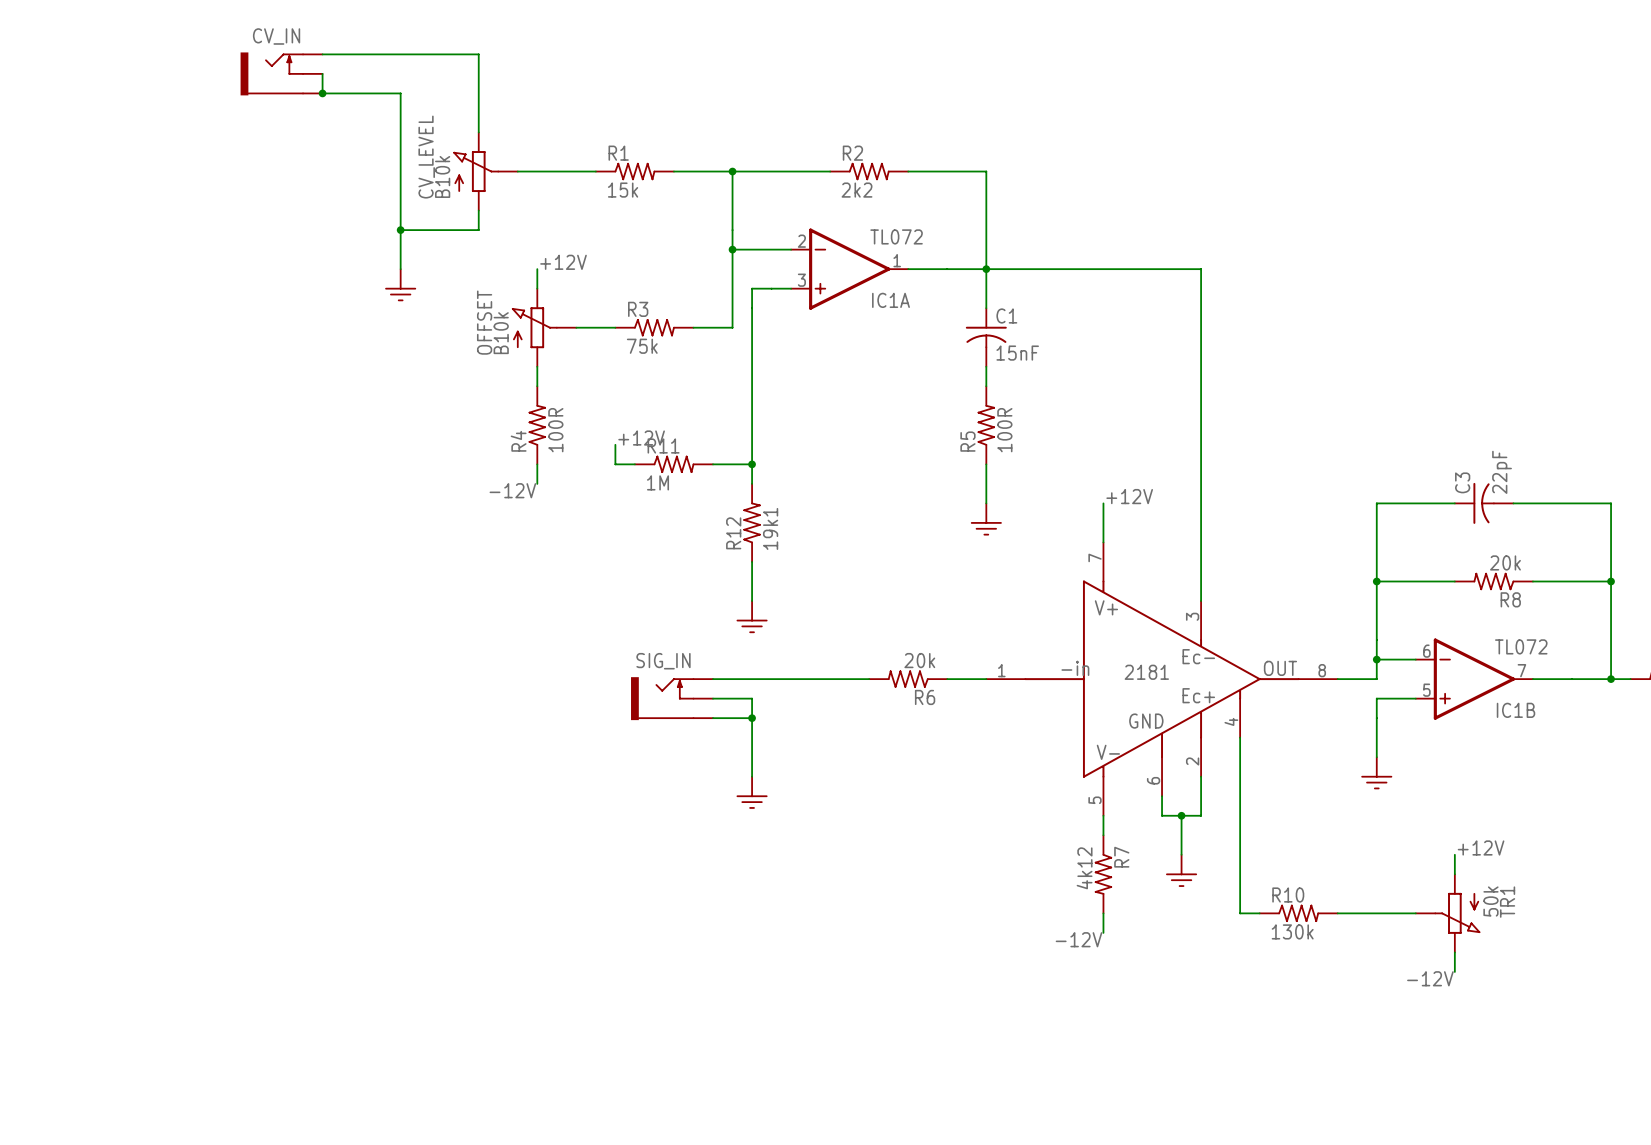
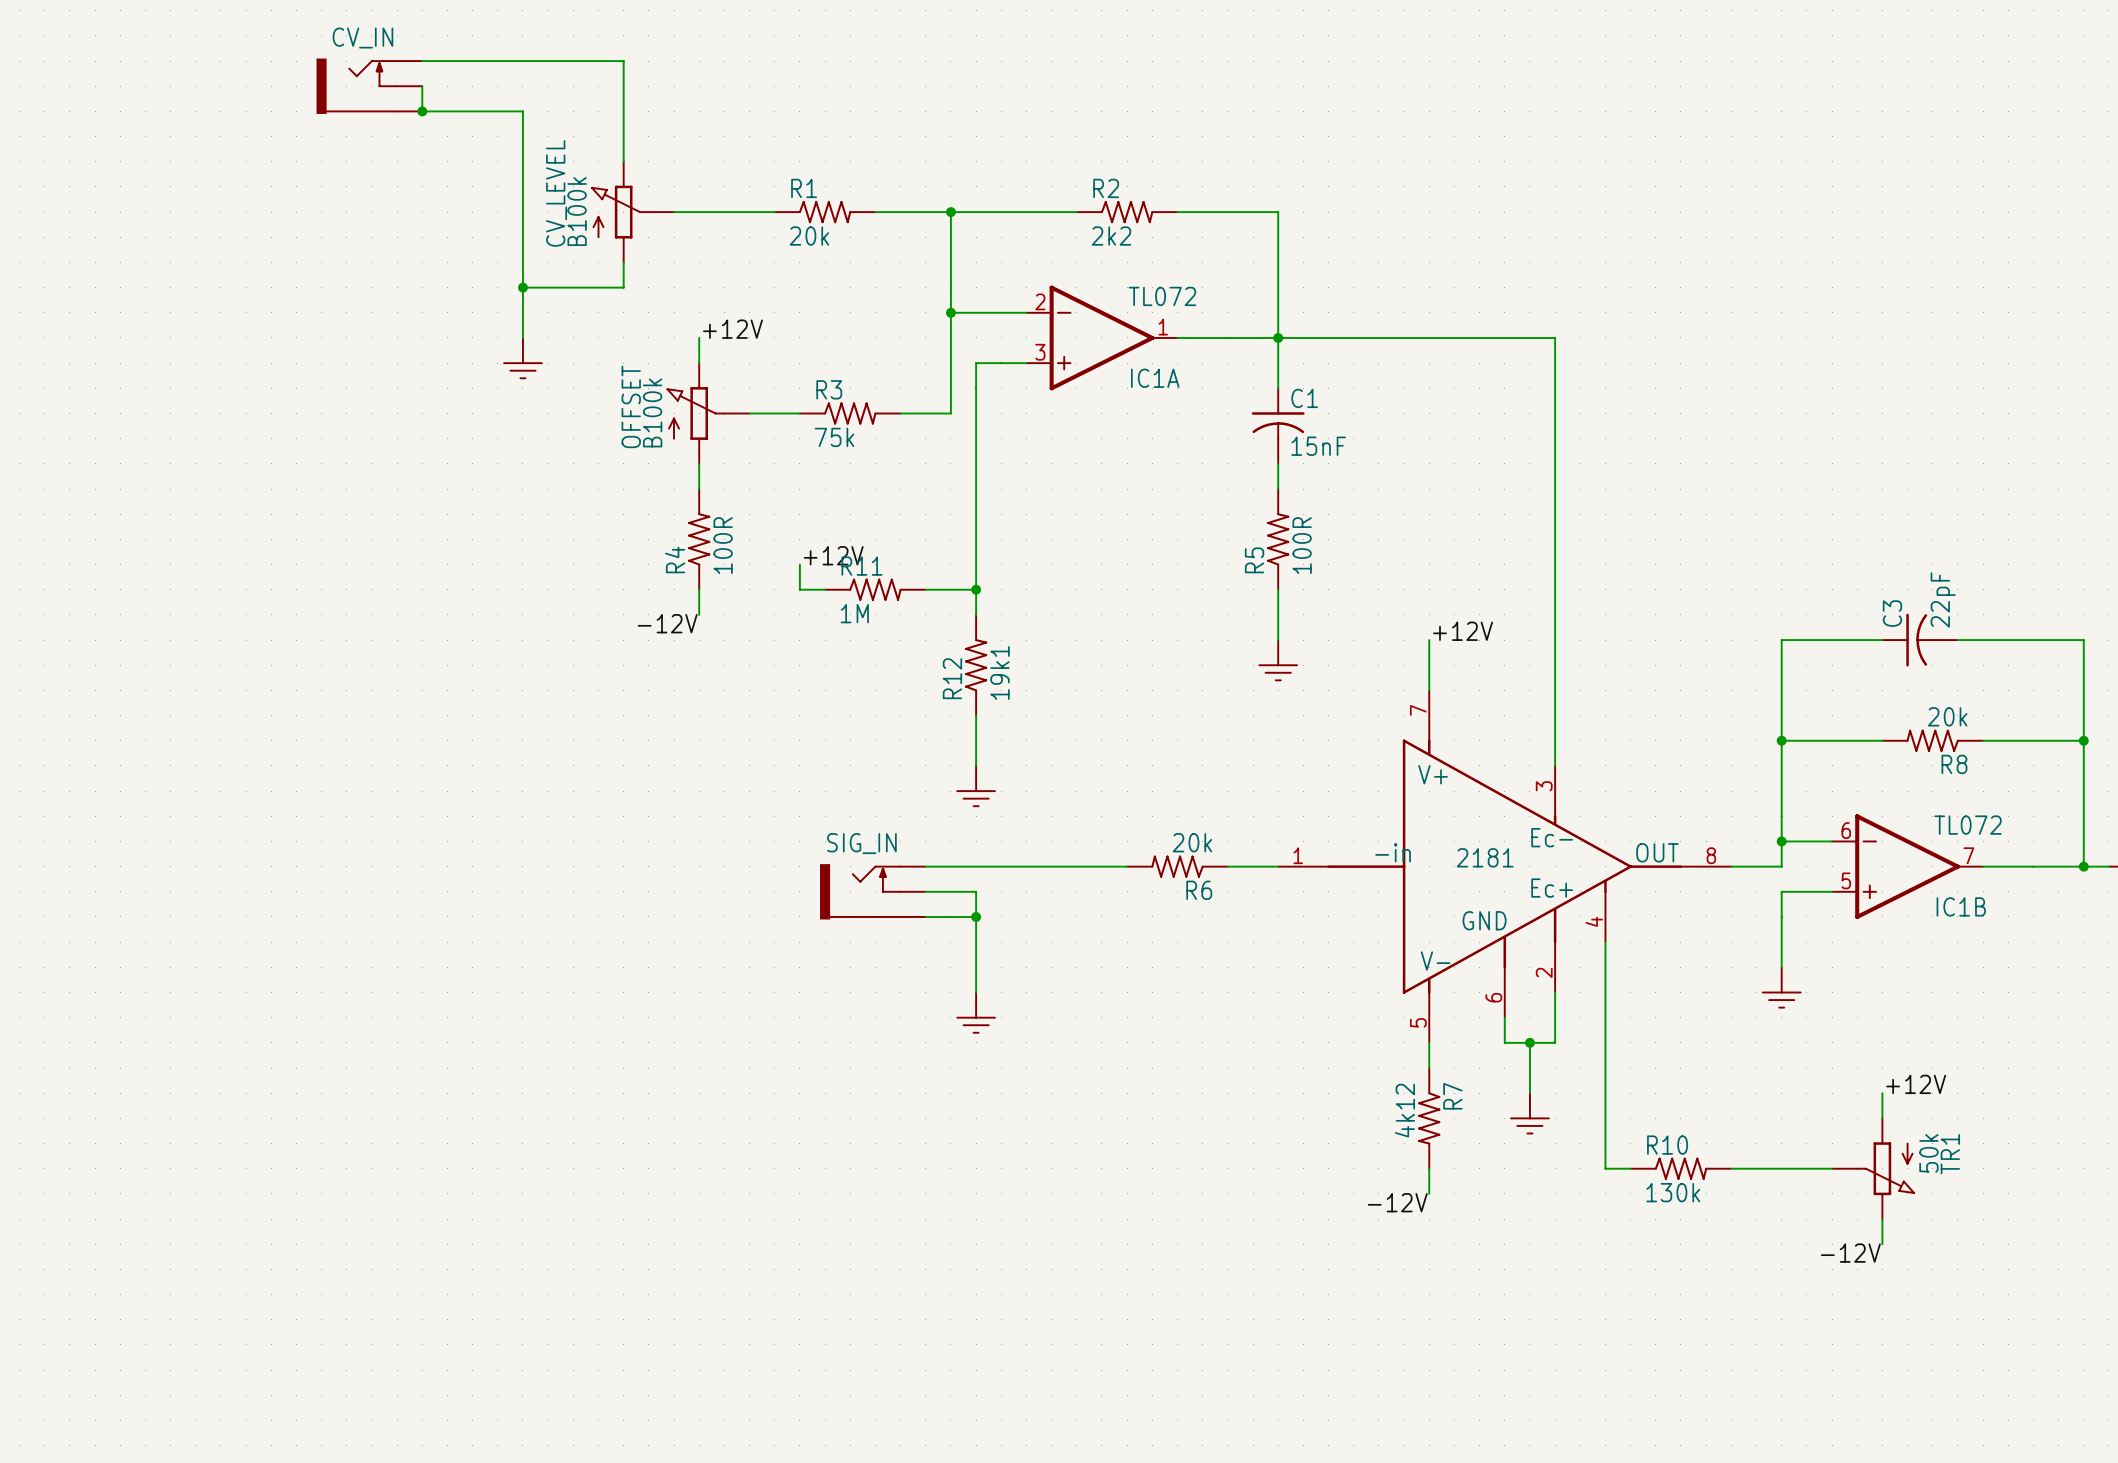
CV_LEVEL value: B10k (442, 176) -> B100k (577, 211)
R1 value: 15k (623, 190) -> 20k (809, 236)
OFFSET value: B10k (501, 333) -> B100k (652, 412)

